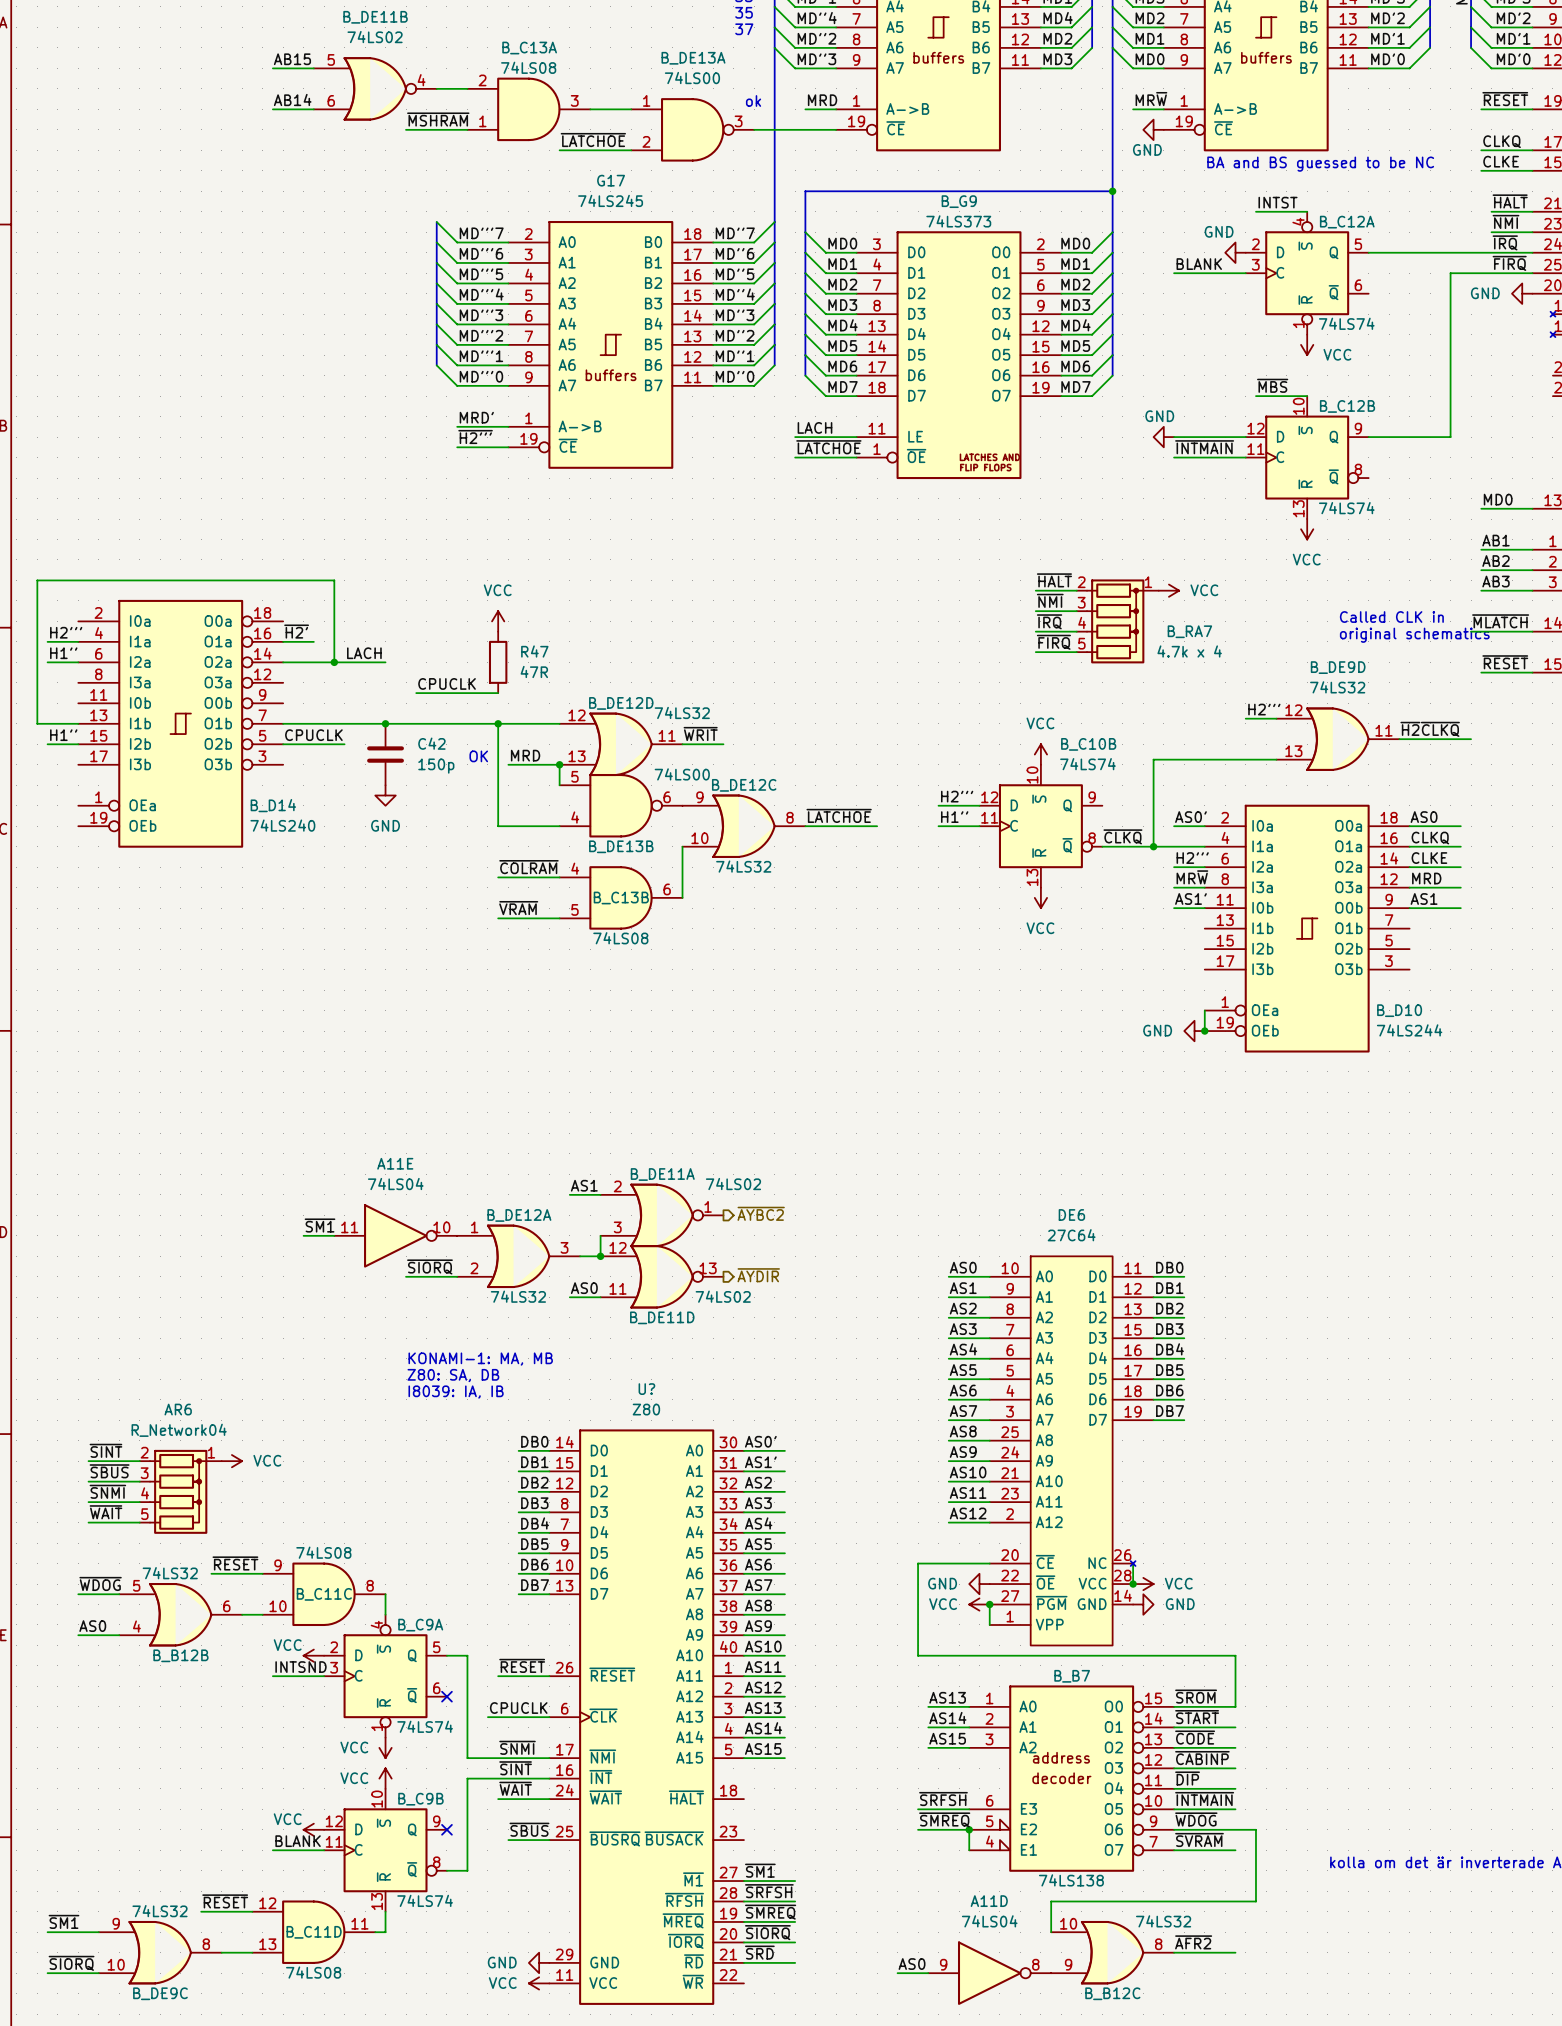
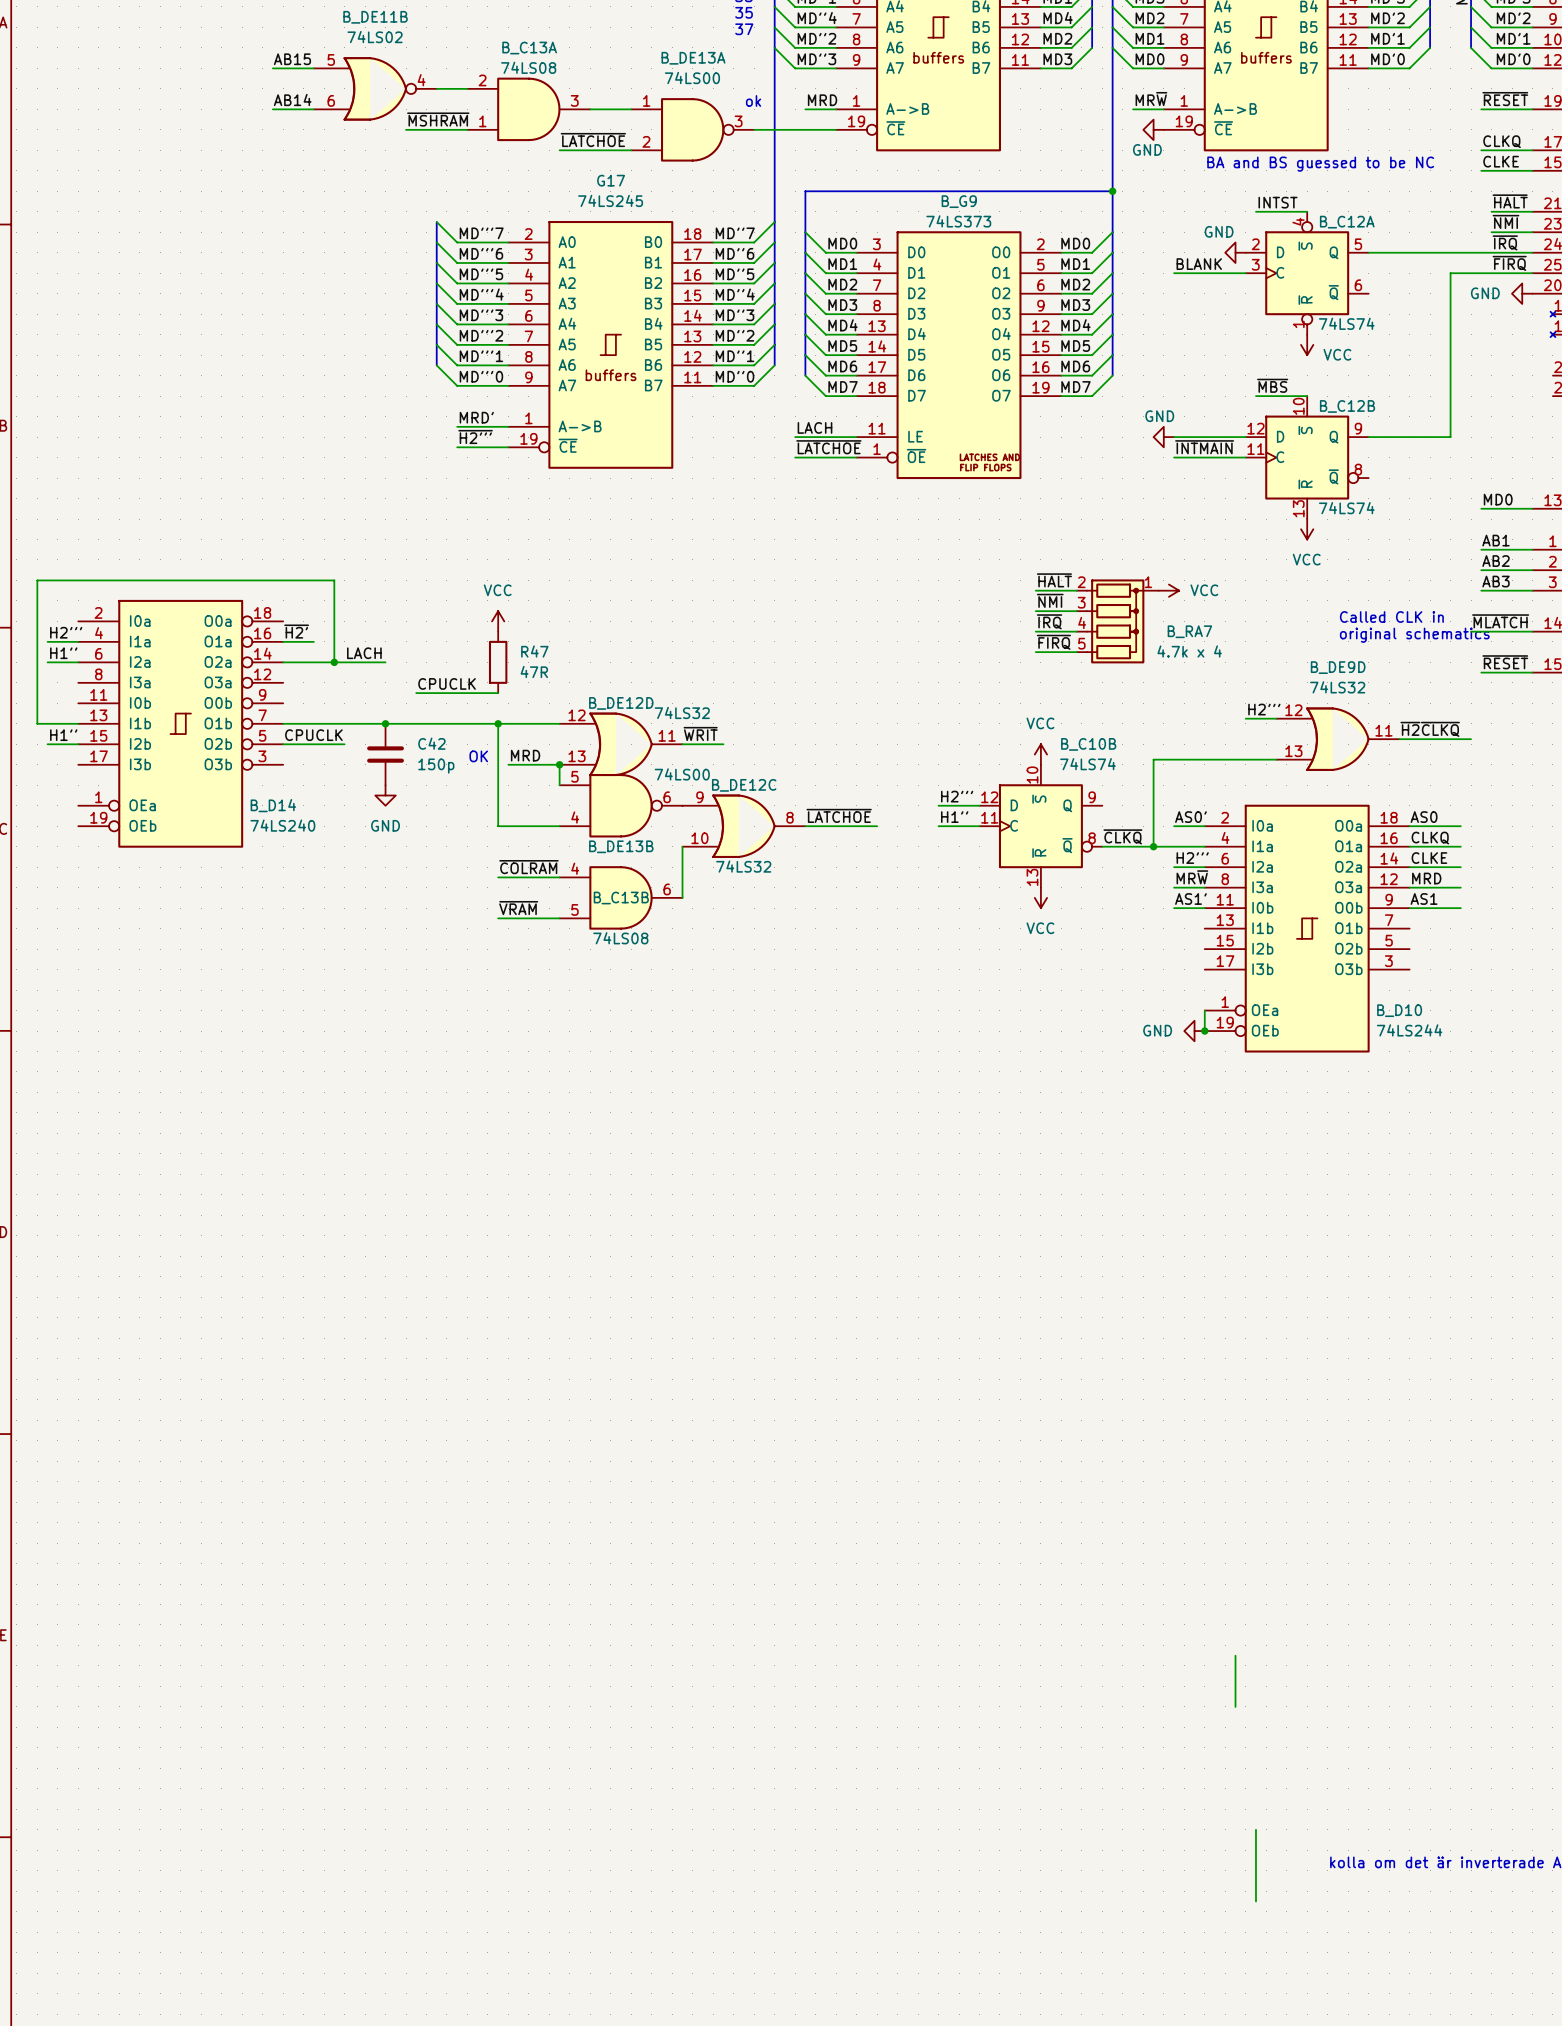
label: AS1 (584, 1185) -> none
wire: (569, 1194) (600, 1194) -> none
hierarchical label: ~{AYBC2} (761, 1213) -> none
B_DE11A: 74LS02 (662, 1215) -> none
label: ~{SM1} (320, 1225) -> none
wire: (303, 1235) (334, 1235) -> none
A11E: 74LS04 (395, 1235) -> none
wire: (600, 1235) (600, 1256) (580, 1256) -> none
B_DE12A: 74LS32 (518, 1256) -> none
junction: (600, 1256) -> none
label: ~{SIORQ} (429, 1266) -> none
label: AS0 (963, 1267) -> none
label: DB0 (1169, 1267) -> none
hierarchical label: ~{AYDIR} (758, 1275) -> none
wire: (406, 1276) (457, 1276) -> none
B_DE11D: 74LS02 (662, 1276) -> none
wire: (948, 1276) (989, 1276) -> none
wire: (1153, 1276) (1184, 1276) -> none
label: AS0 (584, 1288) -> none
label: AS1 (963, 1288) -> none
label: DB1 (1169, 1288) -> none
wire: (569, 1297) (600, 1297) -> none
wire: (948, 1297) (989, 1297) -> none
wire: (1153, 1297) (1184, 1297) -> none
label: AS2 (963, 1308) -> none
label: DB2 (1169, 1308) -> none
wire: (948, 1317) (989, 1317) -> none
wire: (1153, 1317) (1184, 1317) -> none
label: AS3 (963, 1329) -> none
label: DB3 (1169, 1329) -> none
wire: (948, 1338) (989, 1338) -> none
wire: (1153, 1338) (1184, 1338) -> none
label: AS4 (963, 1349) -> none
label: DB4 (1169, 1349) -> none
wire: (948, 1358) (989, 1358) -> none
wire: (1153, 1358) (1184, 1358) -> none
text: KONAMI-1: MA, MB (480, 1359) -> none
label: AS5 (963, 1370) -> none
label: DB5 (1169, 1370) -> none
text: Z80: SA, DB (453, 1375) -> none
wire: (948, 1379) (989, 1379) -> none
wire: (1153, 1379) (1184, 1379) -> none
label: AS6 (963, 1390) -> none
label: DB6 (1169, 1390) -> none
text: I8039: IA, IB (456, 1392) -> none
wire: (948, 1399) (989, 1399) -> none
wire: (1153, 1399) (1184, 1399) -> none
label: AS7 (963, 1411) -> none
label: DB7 (1169, 1411) -> none
wire: (948, 1420) (989, 1420) -> none
wire: (1153, 1420) (1184, 1420) -> none
label: AS8 (963, 1431) -> none
wire: (948, 1440) (989, 1440) -> none
label: DB0 (534, 1441) -> none
label: AS0' (760, 1441) -> none
label: ~{SINT} (105, 1450) -> none
wire: (518, 1450) (549, 1450) -> none
wire: (743, 1450) (784, 1450) -> none
DE6: 27C64 (1071, 1450) -> none
label: AS9 (963, 1452) -> none
wire: (88, 1461) (139, 1461) -> none
power symbol: VCC (231, 1461) -> none
wire: (948, 1461) (989, 1461) -> none
label: DB1 (534, 1462) -> none
label: AS1' (760, 1462) -> none
label: ~{SBUS} (109, 1471) -> none
wire: (518, 1471) (549, 1471) -> none
wire: (743, 1471) (784, 1471) -> none
label: AS10 (968, 1472) -> none
wire: (88, 1481) (139, 1481) -> none
wire: (948, 1481) (989, 1481) -> none
label: DB2 (534, 1482) -> none
label: AS2 (758, 1482) -> none
label: ~{SNMI} (107, 1491) -> none
AR6: R_Network04 (180, 1491) -> none
wire: (518, 1491) (549, 1491) -> none
wire: (743, 1491) (784, 1491) -> none
label: AS11 (968, 1492) -> none
wire: (88, 1502) (139, 1502) -> none
wire: (948, 1502) (989, 1502) -> none
label: DB3 (534, 1503) -> none
label: AS3 (758, 1503) -> none
label: ~{WAIT} (105, 1512) -> none
wire: (518, 1512) (549, 1512) -> none
wire: (743, 1512) (784, 1512) -> none
label: AS12 (968, 1513) -> none
wire: (88, 1522) (139, 1522) -> none
wire: (948, 1522) (989, 1522) -> none
label: DB4 (535, 1523) -> none
label: AS4 (758, 1523) -> none
wire: (518, 1532) (549, 1532) -> none
wire: (743, 1532) (784, 1532) -> none
label: DB5 (534, 1544) -> none
label: AS5 (758, 1544) -> none
wire: (518, 1553) (549, 1553) -> none
wire: (743, 1553) (784, 1553) -> none
label: ~{RESET} (235, 1563) -> none
wire: (989, 1563) (918, 1563) (918, 1655) (1235, 1655) -> none
wire: (1133, 1563) (1133, 1584) -> none
label: DB6 (534, 1564) -> none
label: AS6 (758, 1564) -> none
wire: (211, 1573) (262, 1573) -> none
wire: (518, 1573) (549, 1573) -> none
wire: (743, 1573) (784, 1573) -> none
label: ~{WDOG} (100, 1583) -> none
power symbol: GND (979, 1584) -> none
junction: (1133, 1584) -> none
power symbol: VCC (1143, 1584) -> none
label: DB7 (535, 1585) -> none
label: AS7 (758, 1585) -> none
wire: (78, 1594) (119, 1594) -> none
B_C11C: 74LS08 (324, 1594) -> none
wire: (385, 1594) (385, 1614) -> none
wire: (518, 1594) (549, 1594) -> none
wire: (743, 1594) (784, 1594) -> none
power symbol: VCC (979, 1604) -> none
wire: (989, 1604) (989, 1624) -> none
junction: (989, 1604) -> none
power symbol: GND (1143, 1604) -> none
label: AS8 (758, 1605) -> none
B_B12B: 74LS32 (180, 1614) -> none
wire: (242, 1614) (262, 1614) -> none
wire: (743, 1614) (784, 1614) -> none
label: AS0 (92, 1626) -> none
label: AS9 (758, 1626) -> none
wire: (78, 1635) (119, 1635) -> none
wire: (743, 1635) (784, 1635) -> none
label: AS10 (763, 1646) -> none
power symbol: VCC (313, 1655) -> none
wire: (446, 1655) (467, 1655) (467, 1758) (549, 1758) -> none
wire: (743, 1655) (784, 1655) -> none
label: ~{RESET} (522, 1665) -> none
label: INTSND (300, 1667) -> none
label: AS11 (763, 1667) -> none
wire: (272, 1676) (324, 1676) -> none
B_C9A: 74LS74 (385, 1676) -> none
wire: (498, 1676) (549, 1676) -> none
wire: (743, 1676) (784, 1676) -> none
label: AS12 (763, 1687) -> none
no-connect mark: (446, 1696) -> none
wire: (743, 1696) (784, 1696) -> none
label: ~{SROM} (1196, 1696) -> none
label: AS13 (947, 1697) -> none
wire: (928, 1706) (969, 1706) -> none
wire: (1174, 1706) (1235, 1706) -> none
label: CPUCLK (518, 1708) -> none
label: AS13 (763, 1708) -> none
wire: (487, 1717) (549, 1717) -> none
U?: Z80 (646, 1717) -> none
wire: (743, 1717) (784, 1717) -> none
label: ~{START} (1197, 1717) -> none
label: AS14 (947, 1718) -> none
wire: (928, 1727) (969, 1727) -> none
wire: (1174, 1727) (1235, 1727) -> none
label: AS14 (763, 1728) -> none
wire: (743, 1737) (784, 1737) -> none
label: ~{CODE} (1195, 1737) -> none
label: AS15 (947, 1738) -> none
power symbol: VCC (385, 1747) -> none
label: ~{SNMI} (517, 1747) -> none
wire: (928, 1747) (969, 1747) -> none
wire: (1174, 1747) (1235, 1747) -> none
label: AS15 (763, 1748) -> none
wire: (743, 1758) (784, 1758) -> none
label: ~{CABINP} (1202, 1758) -> none
label: ~{SINT} (515, 1768) -> none
wire: (1174, 1768) (1235, 1768) -> none
power symbol: VCC (385, 1778) -> none
wire: (549, 1778) (467, 1778) (467, 1870) (446, 1870) -> none
B_B7: 74LS138 (1071, 1778) -> none
label: ~{DIP} (1187, 1778) -> none
label: ~{WAIT} (515, 1788) -> none
wire: (1174, 1788) (1235, 1788) -> none
wire: (498, 1799) (549, 1799) -> none
label: ~{SRFSH} (943, 1799) -> none
label: ~{INTMAIN} (1204, 1799) -> none
wire: (918, 1809) (969, 1809) -> none
wire: (1174, 1809) (1235, 1809) -> none
label: ~{SMREQ} (944, 1819) -> none
label: ~{WDOG} (1196, 1819) -> none
power symbol: VCC (313, 1829) -> none
no-connect mark: (446, 1829) -> none
label: ~{SBUS} (529, 1829) -> none
wire: (918, 1829) (969, 1829) (969, 1850) -> none
junction: (969, 1829) -> none
wire: (1174, 1829) (1255, 1829) -> none
label: ~{SVRAM} (1199, 1839) -> none
wire: (508, 1840) (549, 1840) -> none
label: BLANK (298, 1841) -> none
wire: (272, 1850) (324, 1850) -> none
B_C9B: 74LS74 (385, 1850) -> none
wire: (1174, 1850) (1235, 1850) -> none
label: ~{SM1} (760, 1870) -> none
wire: (743, 1881) (795, 1881) -> none
label: ~{SRFSH} (769, 1891) -> none
label: ~{RESET} (225, 1901) -> none
wire: (743, 1901) (795, 1901) -> none
wire: (1255, 1901) (1051, 1901) (1051, 1932) -> none
wire: (201, 1911) (252, 1911) -> none
wire: (385, 1911) (385, 1932) (375, 1932) -> none
label: ~{SMREQ} (770, 1912) -> none
label: ~{SM1} (64, 1921) -> none
wire: (743, 1921) (795, 1921) -> none
wire: (47, 1932) (98, 1932) -> none
B_C11D: 74LS08 (313, 1932) -> none
label: ~{SIORQ} (767, 1932) -> none
wire: (743, 1942) (795, 1942) -> none
label: ~{AFR2} (1193, 1942) -> none
B_DE9C: 74LS32 (160, 1952) -> none
wire: (221, 1952) (252, 1952) -> none
label: ~{SRD} (759, 1952) -> none
B_B12C: 74LS32 (1112, 1952) -> none
wire: (1174, 1952) (1235, 1952) -> none
power symbol: GND (539, 1962) -> none
wire: (743, 1962) (795, 1962) -> none
label: ~{SIORQ} (71, 1963) -> none
label: AS0 (912, 1964) -> none
wire: (47, 1973) (98, 1973) -> none
wire: (897, 1973) (928, 1973) -> none
A11D: 74LS04 (989, 1973) -> none
power symbol: VCC (539, 1983) -> none

